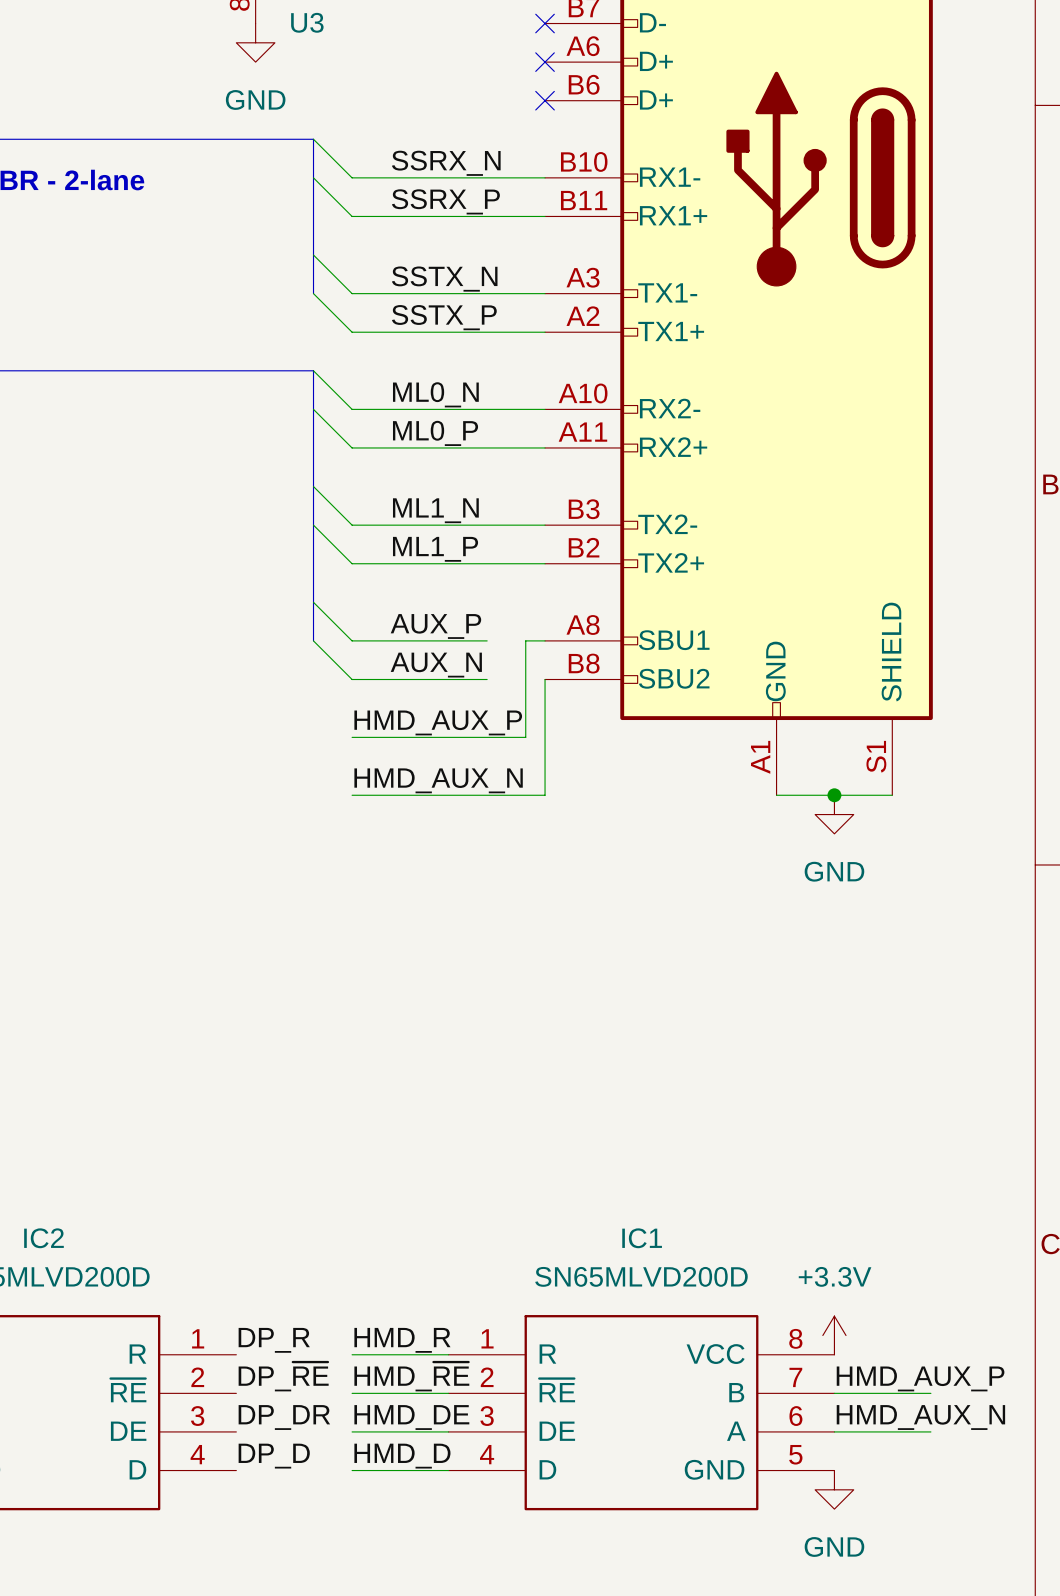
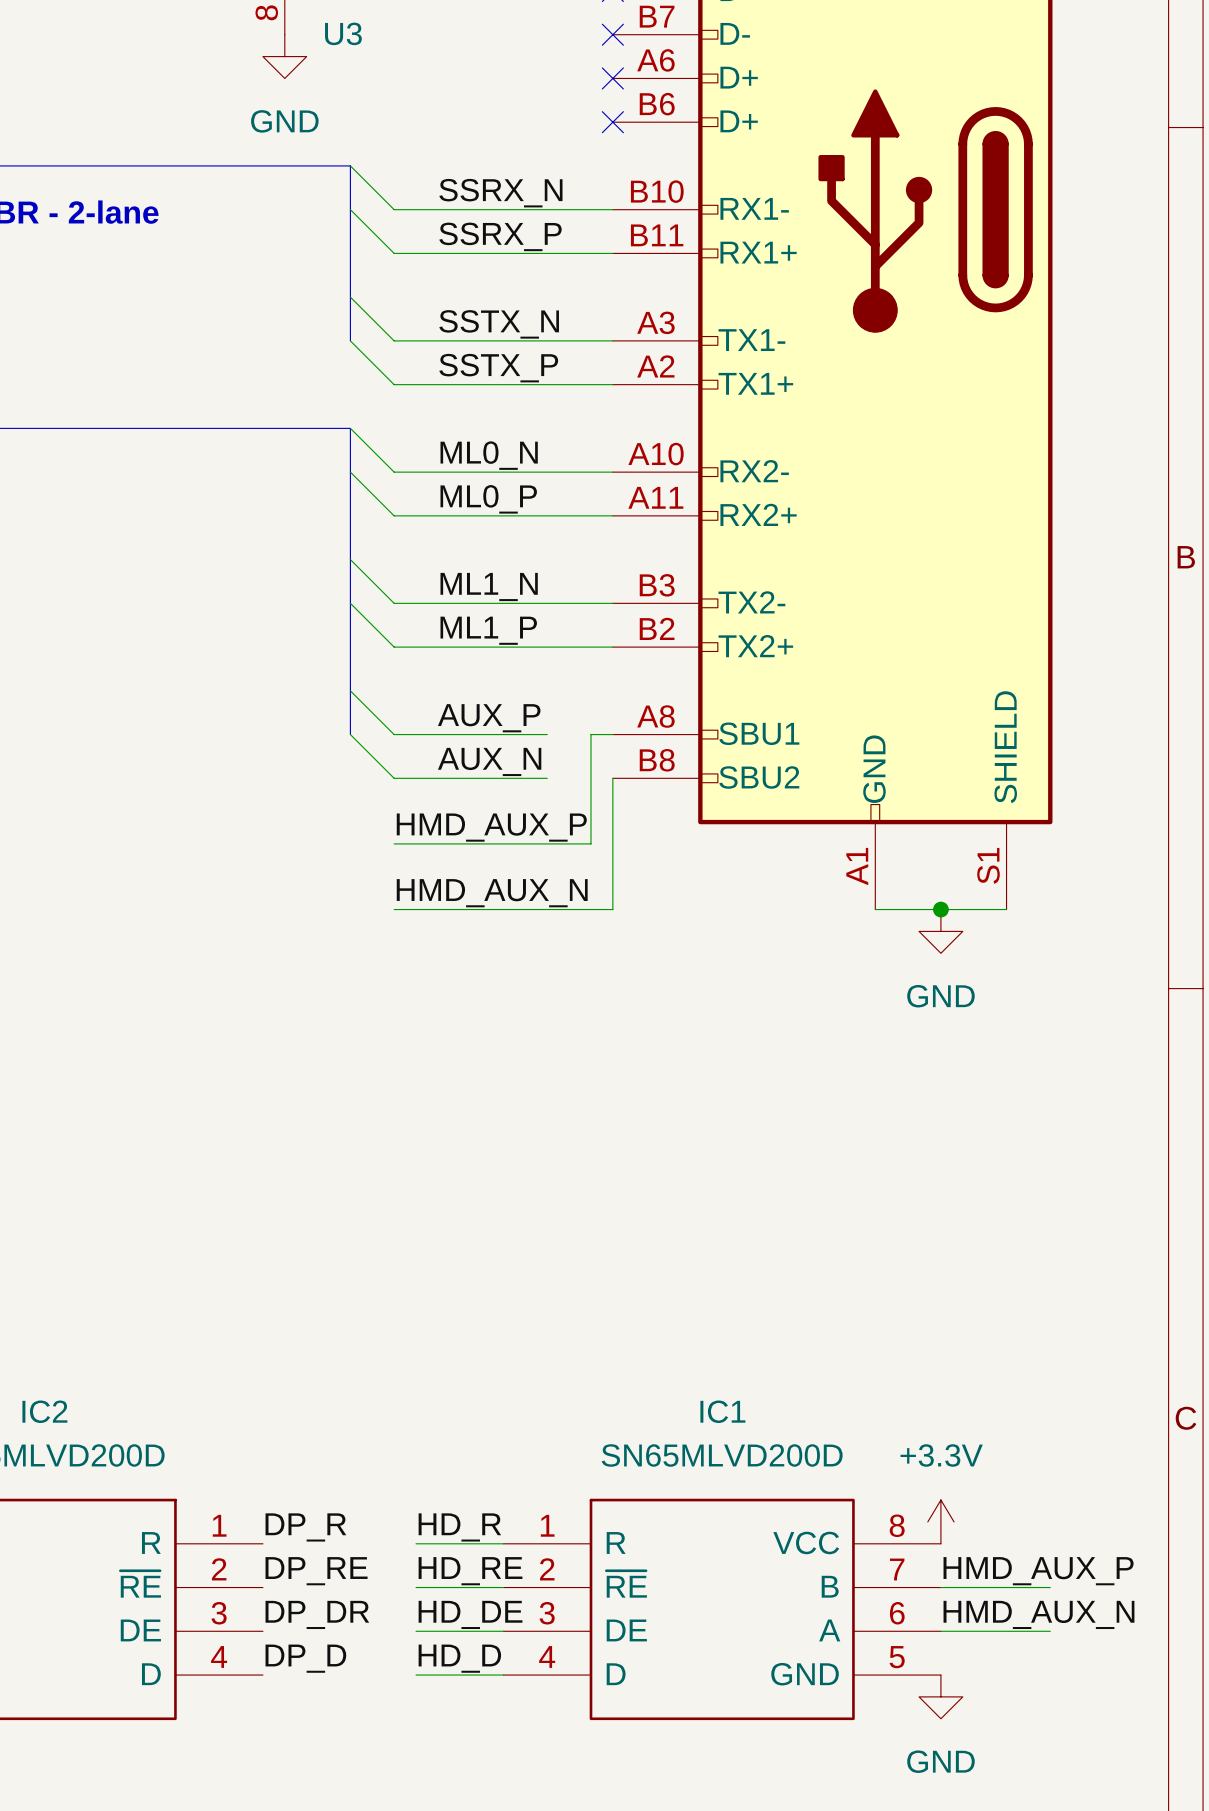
label: HMD_R (402, 1340) -> HD_R (459, 1527)
wire: (352, 1354) (371, 1354) -> none
label: DP_~{RE} (283, 1376) -> DP_RE (316, 1571)
label: HMD_~{RE} (411, 1376) -> HD_RE (470, 1571)
wire: (352, 1393) (371, 1393) -> none
label: HMD_DE (411, 1417) -> HD_DE (470, 1614)
wire: (352, 1431) (371, 1431) -> none
label: HMD_D (402, 1456) -> HD_D (459, 1658)
wire: (352, 1470) (371, 1470) -> none

